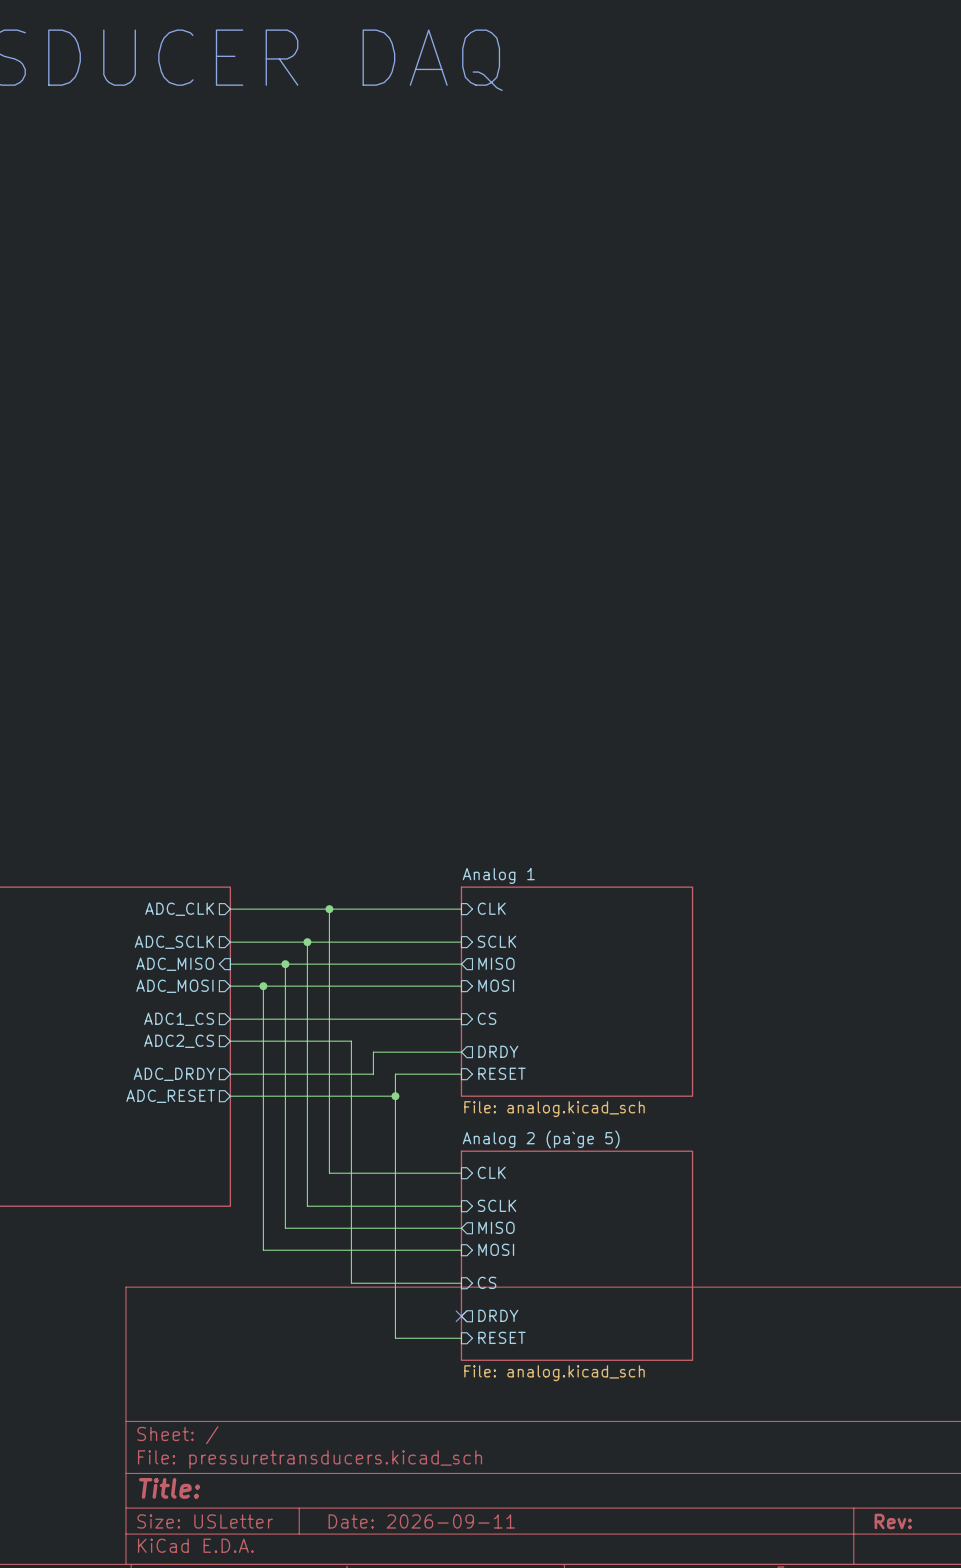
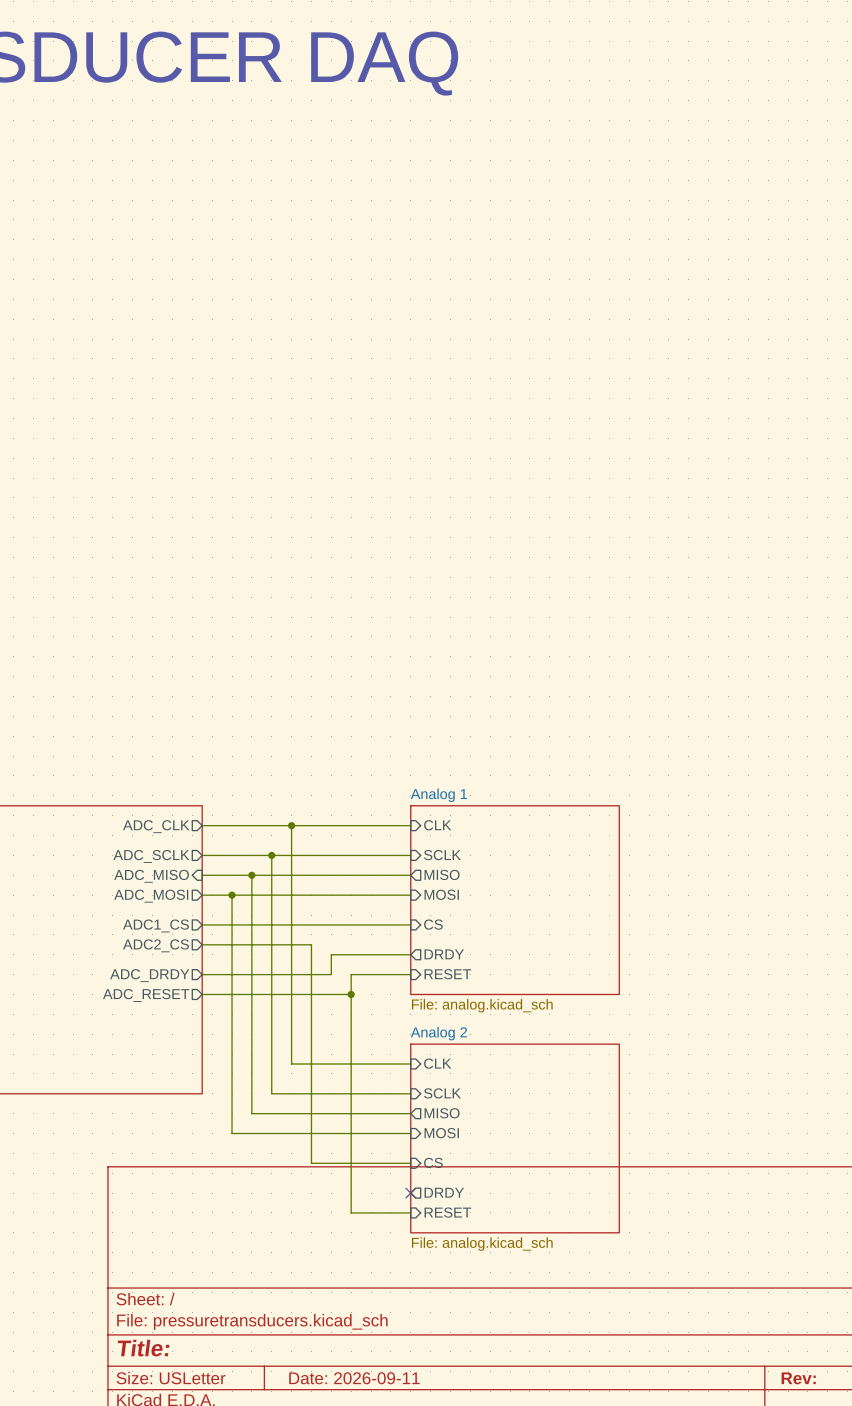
sheet Analog 2 (pa`ge 5) name: Analog 2 (pa`ge 5) (541, 1139) -> Analog 2 (438, 1033)

